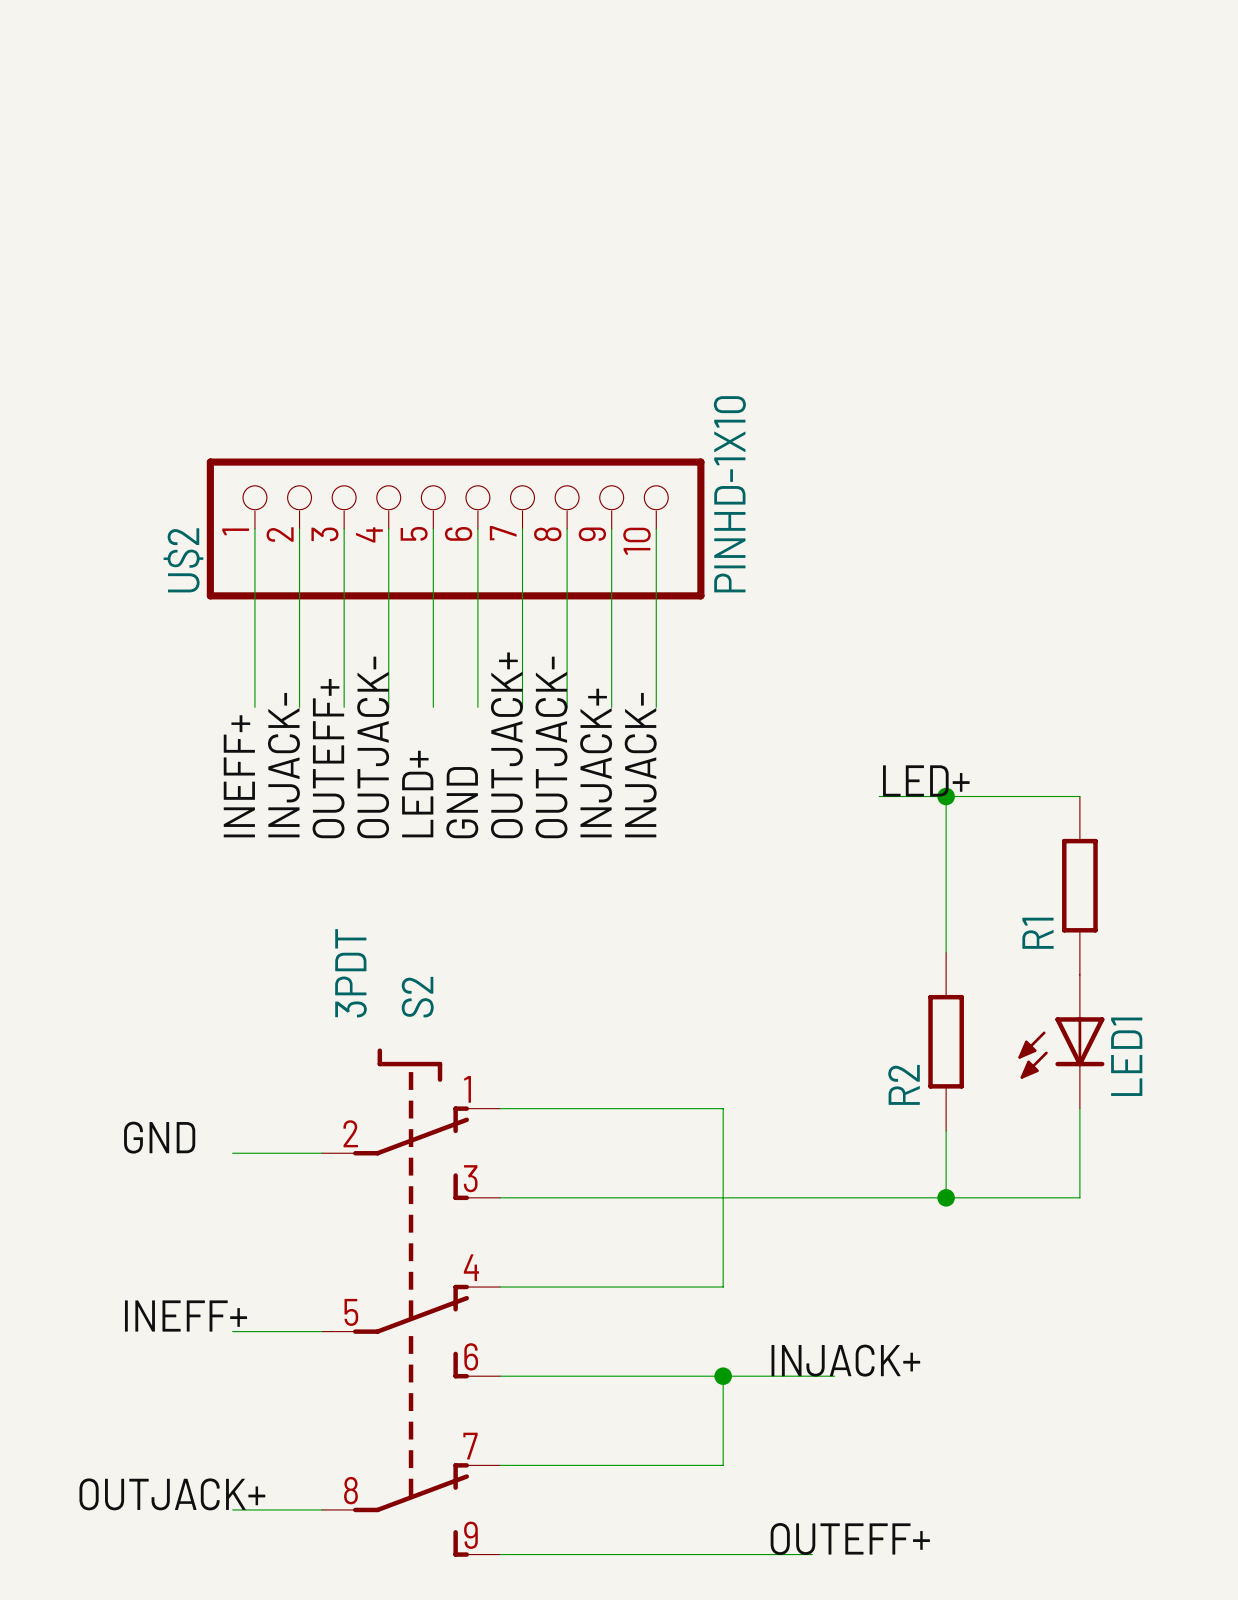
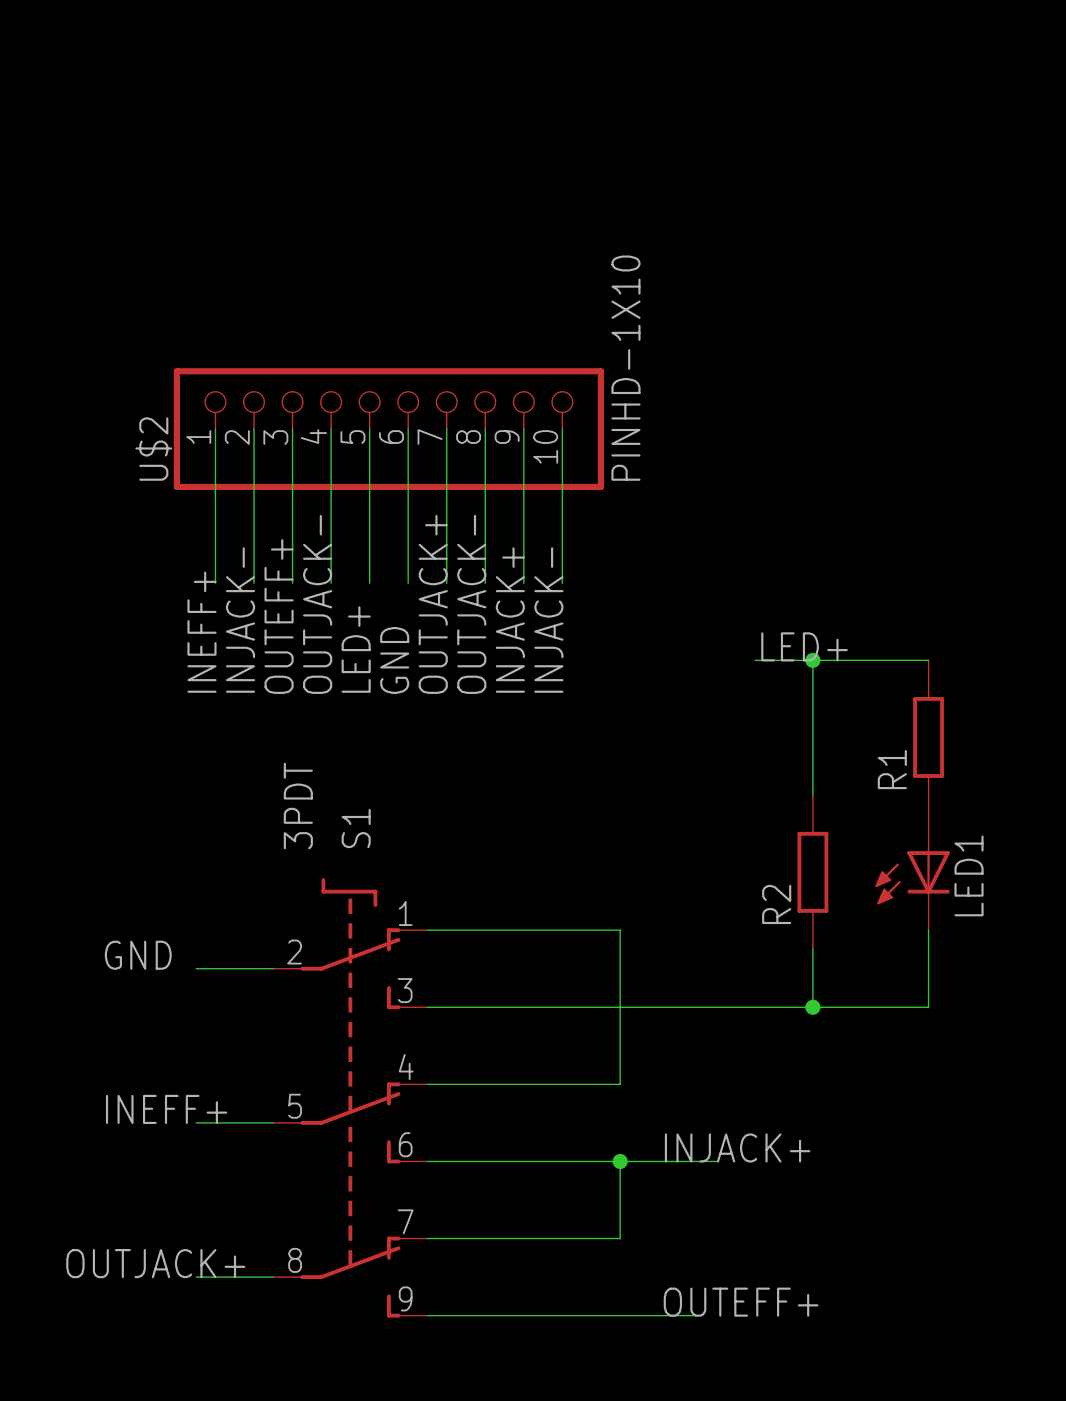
S2 name: S2 (417, 997) -> S1 (356, 828)

